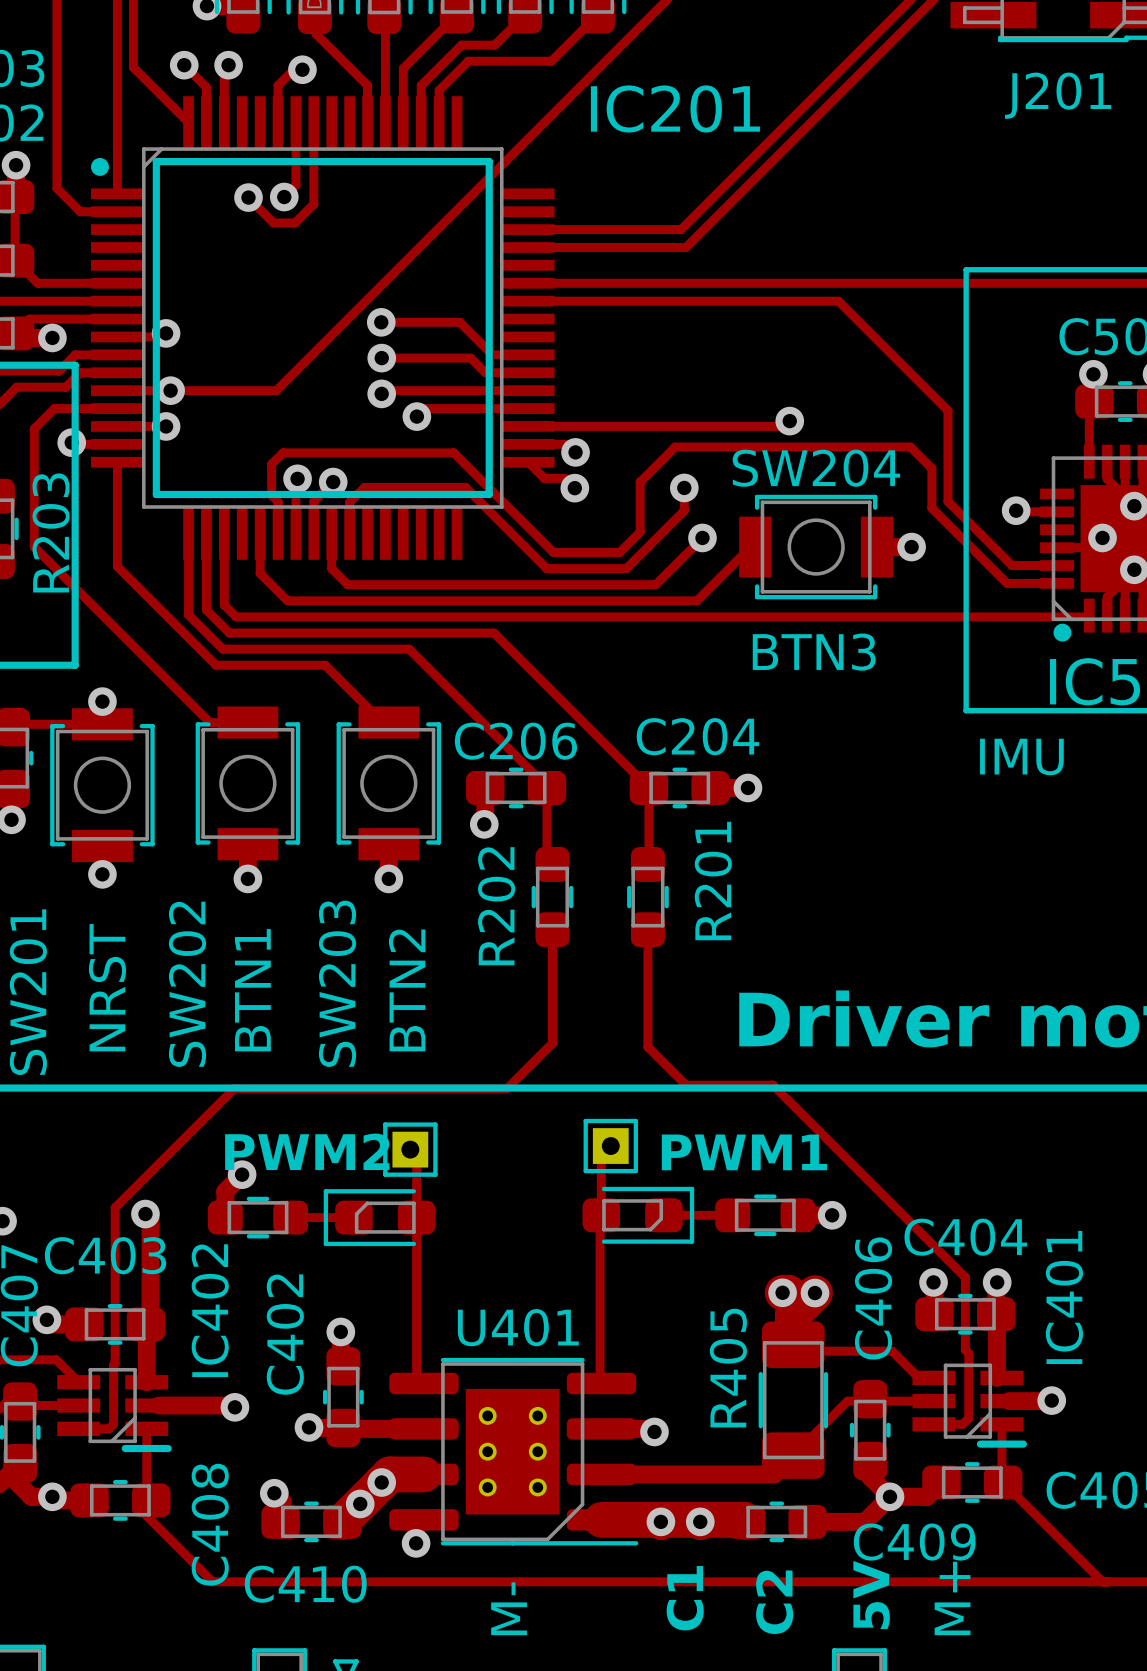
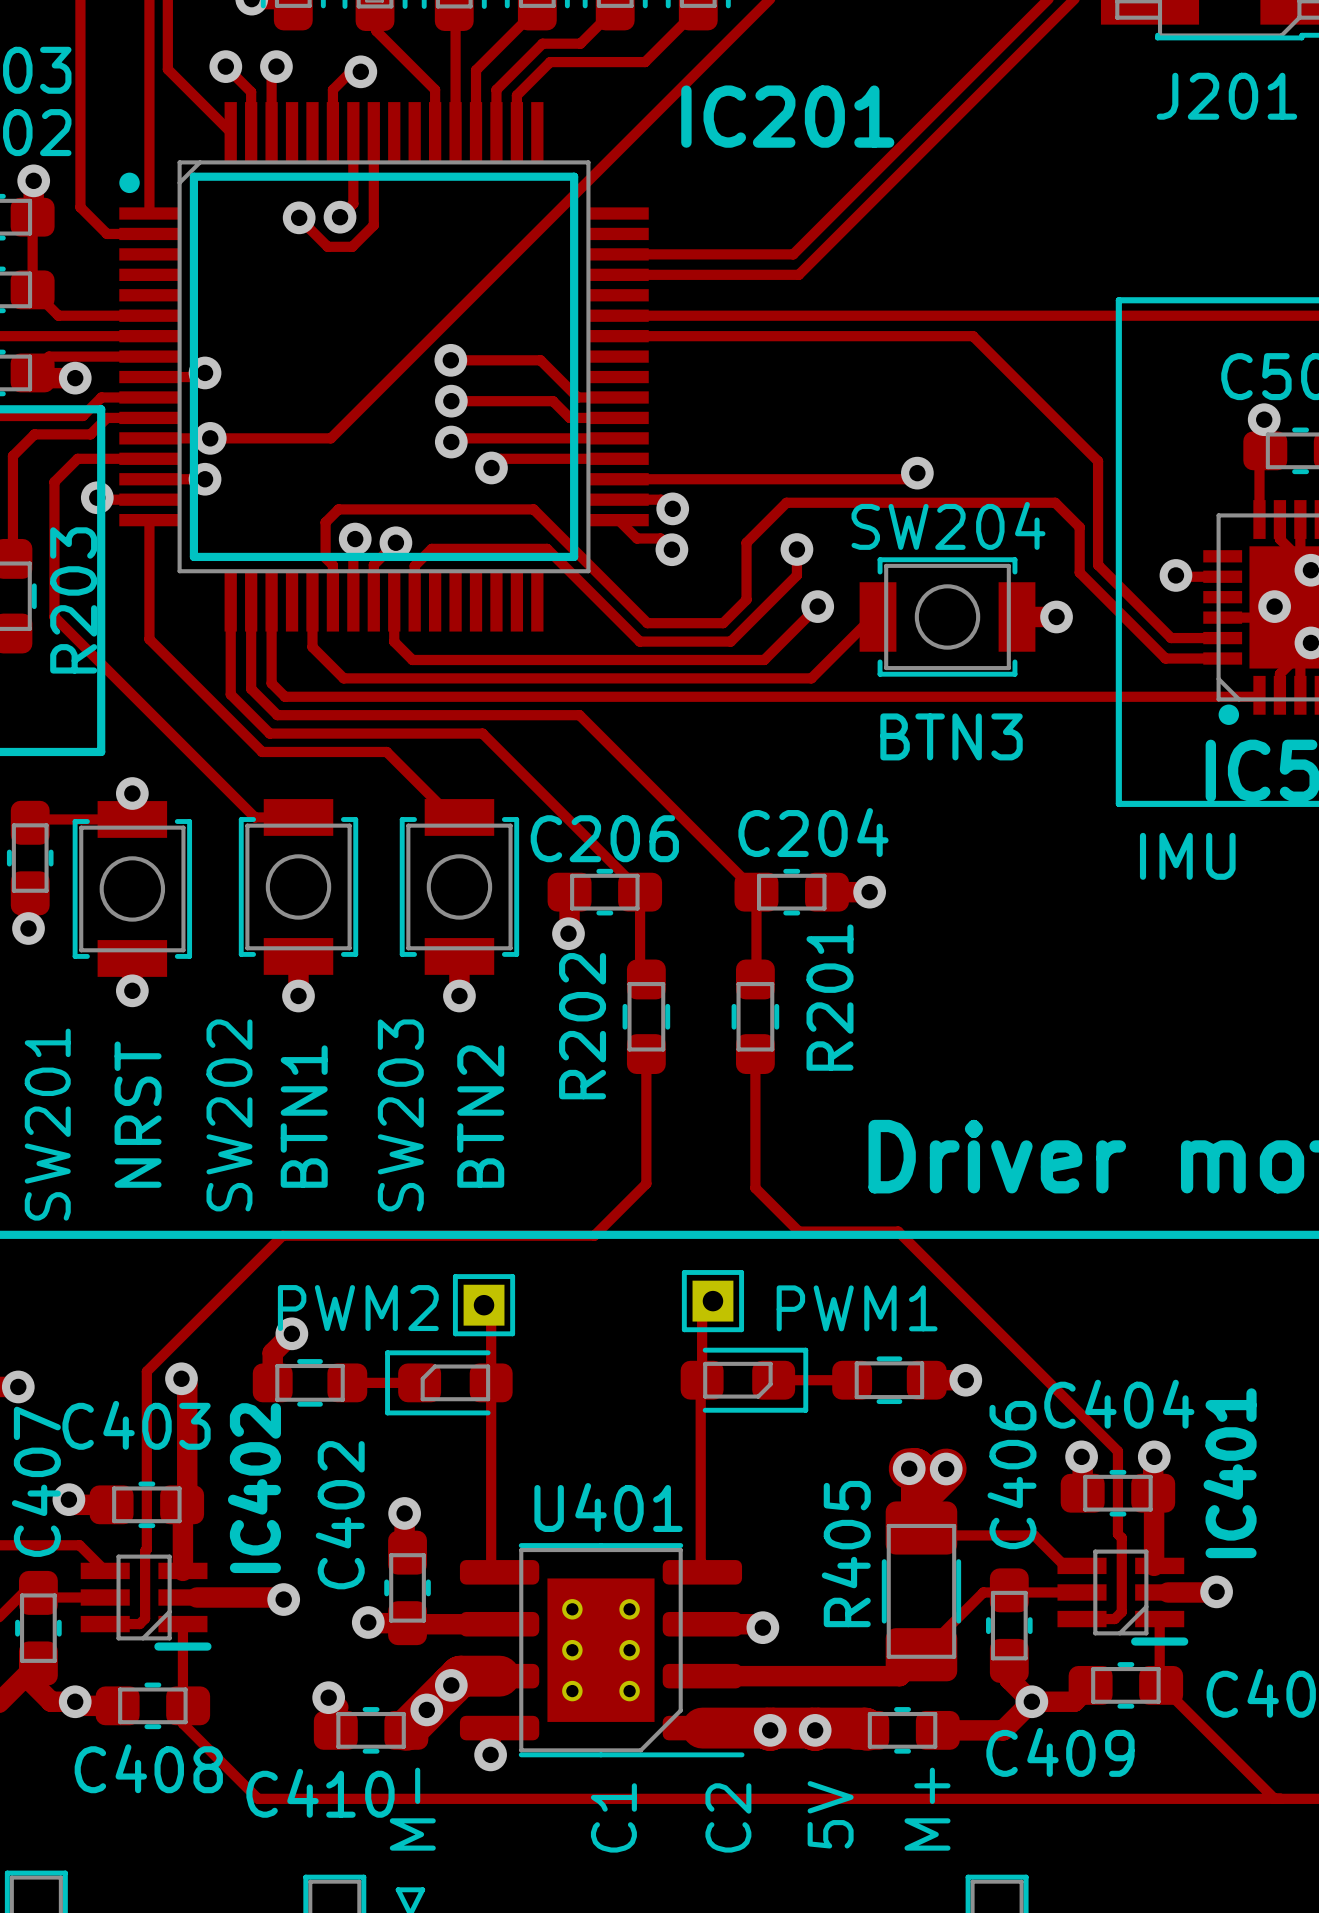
C408 name rotation: 0° (210, 1524) -> 90° clockwise (148, 1768)
C410 name position: C410 (305, 1584) -> C410 (320, 1793)
text position: 5V (871, 1594) -> 5V (830, 1814)
text position: C1 (685, 1598) -> C1 (613, 1817)
text position: M+ (952, 1598) -> M+ (927, 1809)
text position: C2 (774, 1602) -> C2 (728, 1817)
text position: M- (509, 1608) -> M- (412, 1809)

